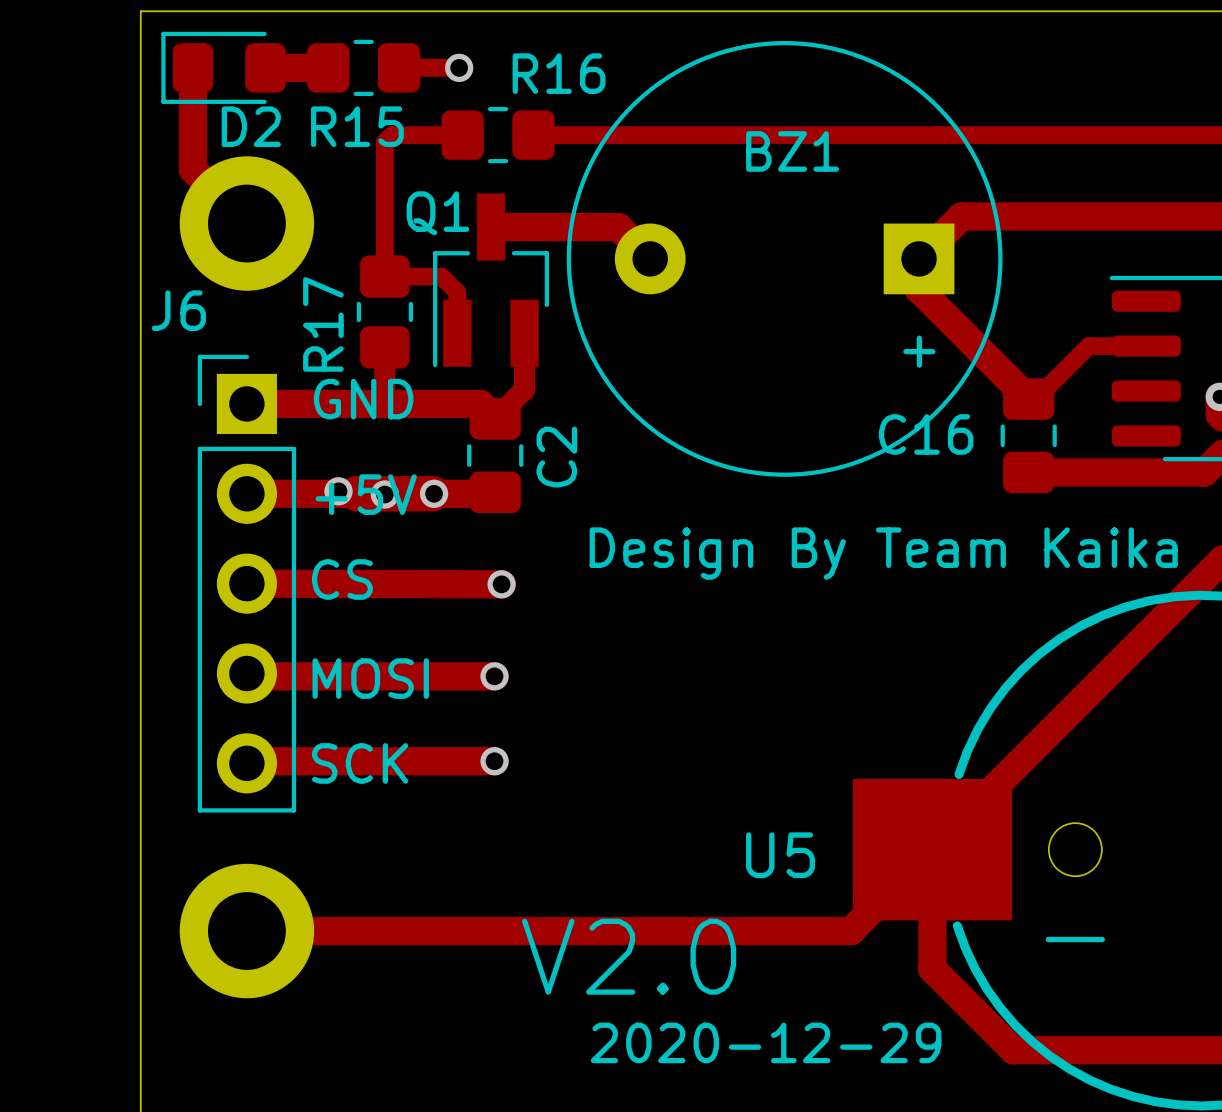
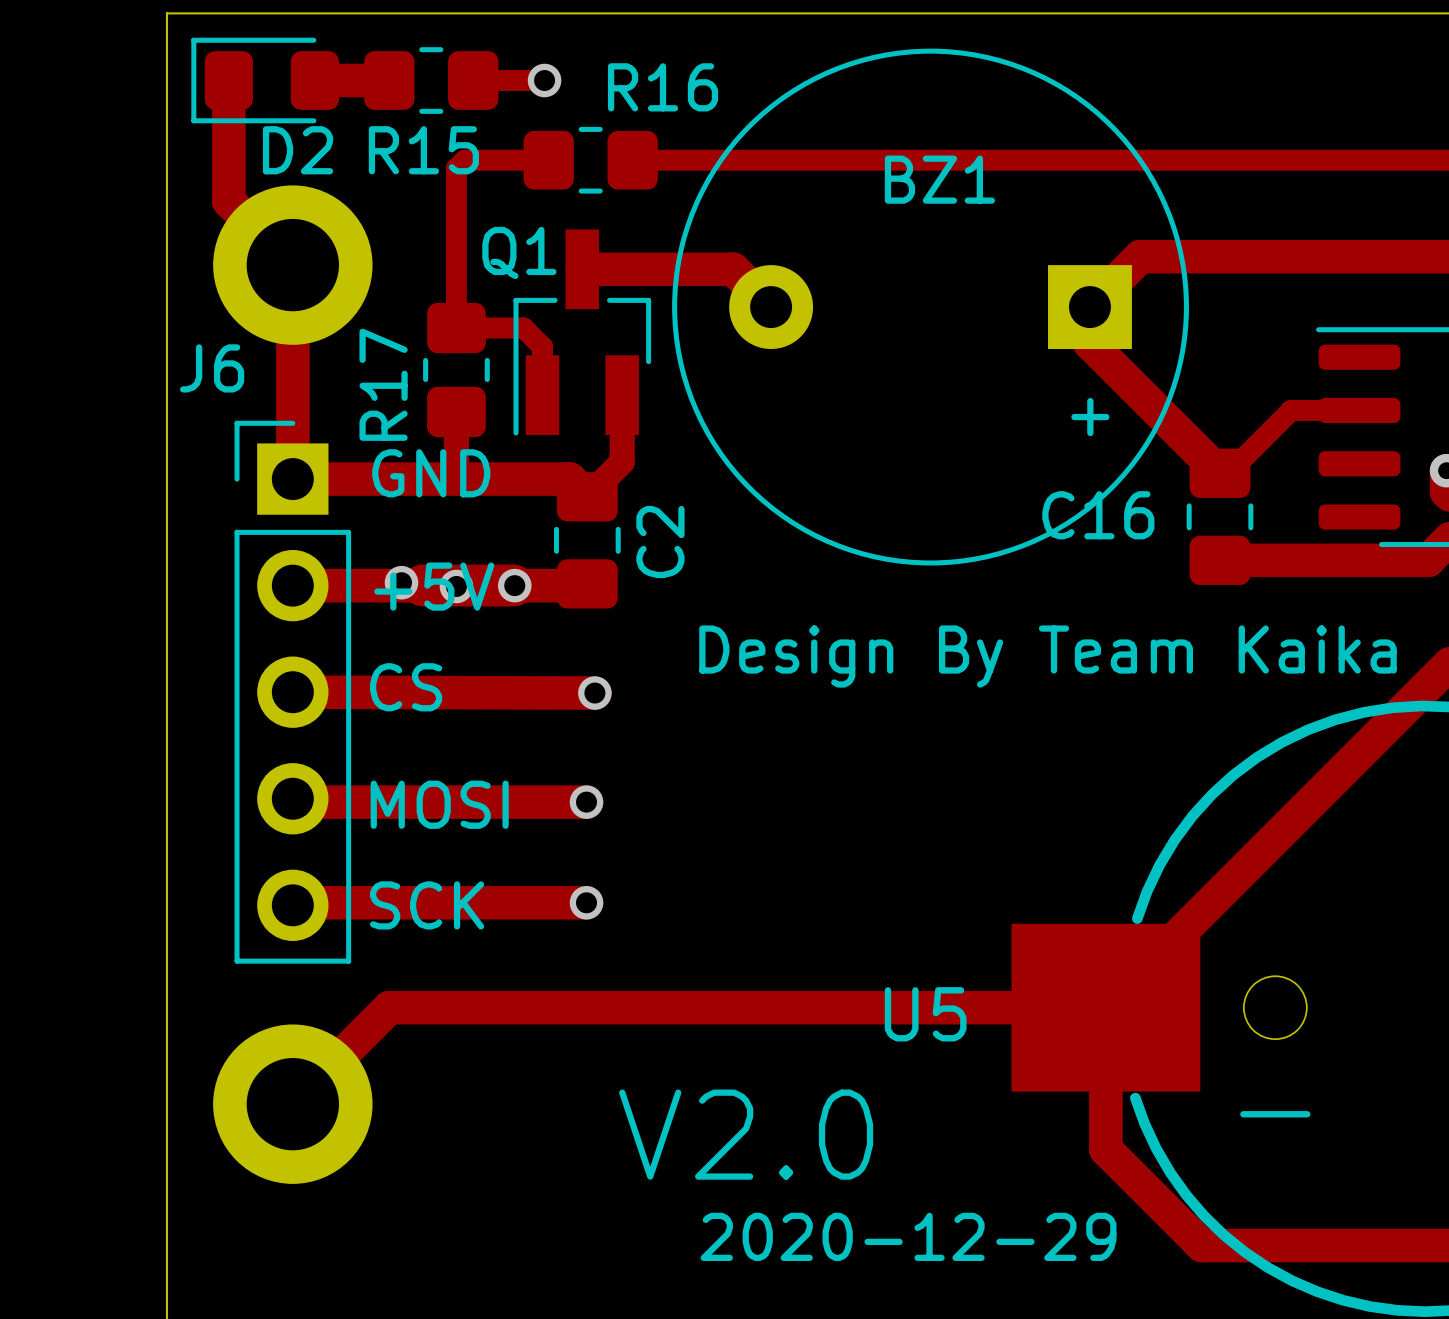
track: none -> (292, 265) (292, 479)
track: (932, 849) (851, 931) (246, 931) -> (1105, 1007) (389, 1007) (292, 1104)

